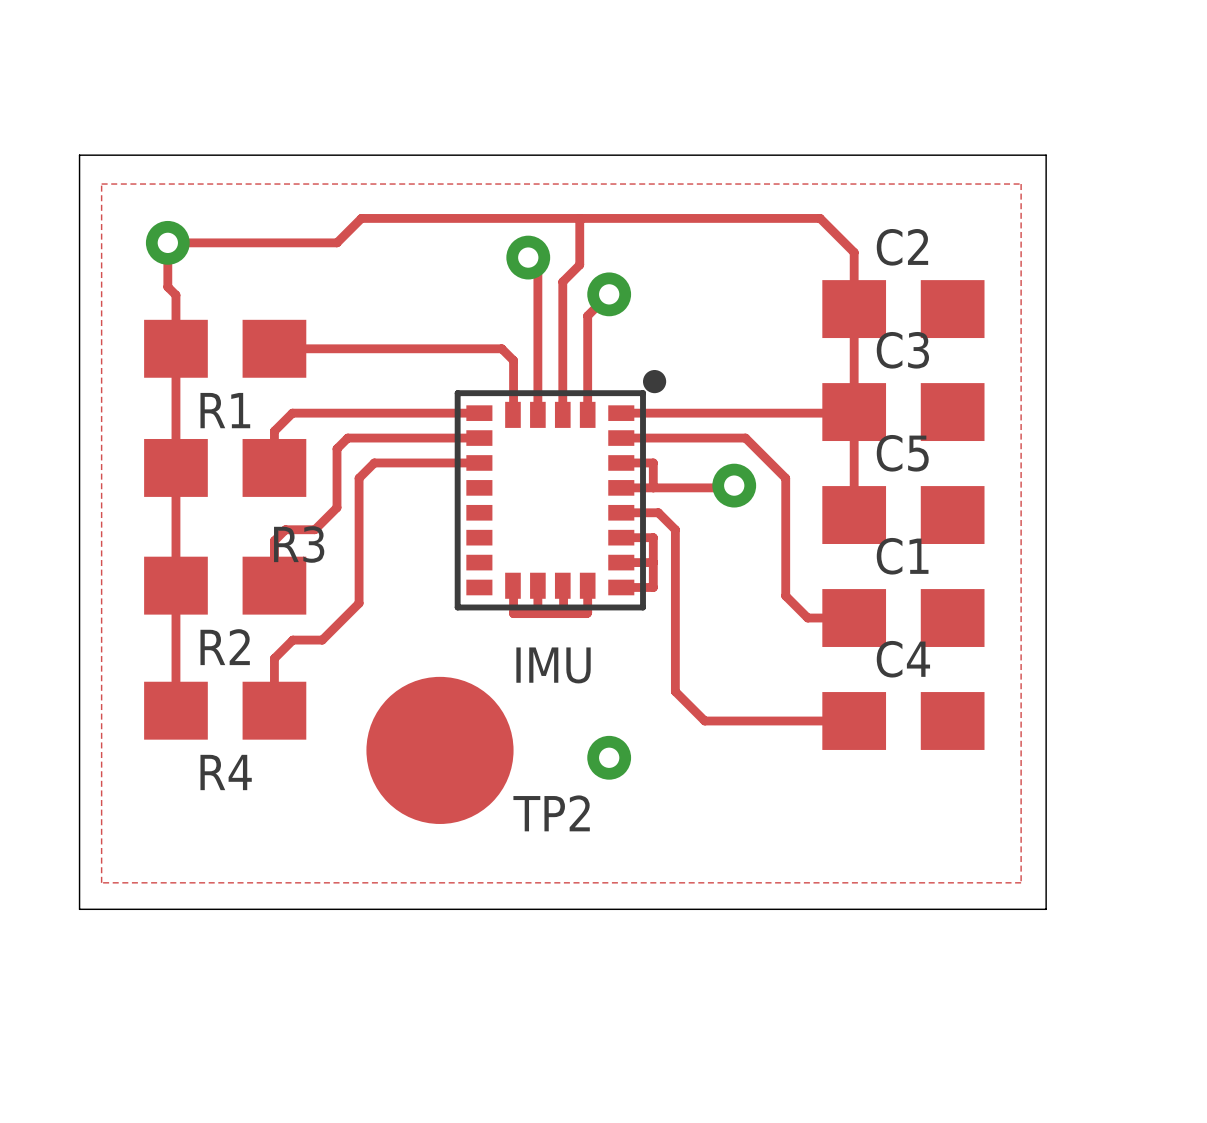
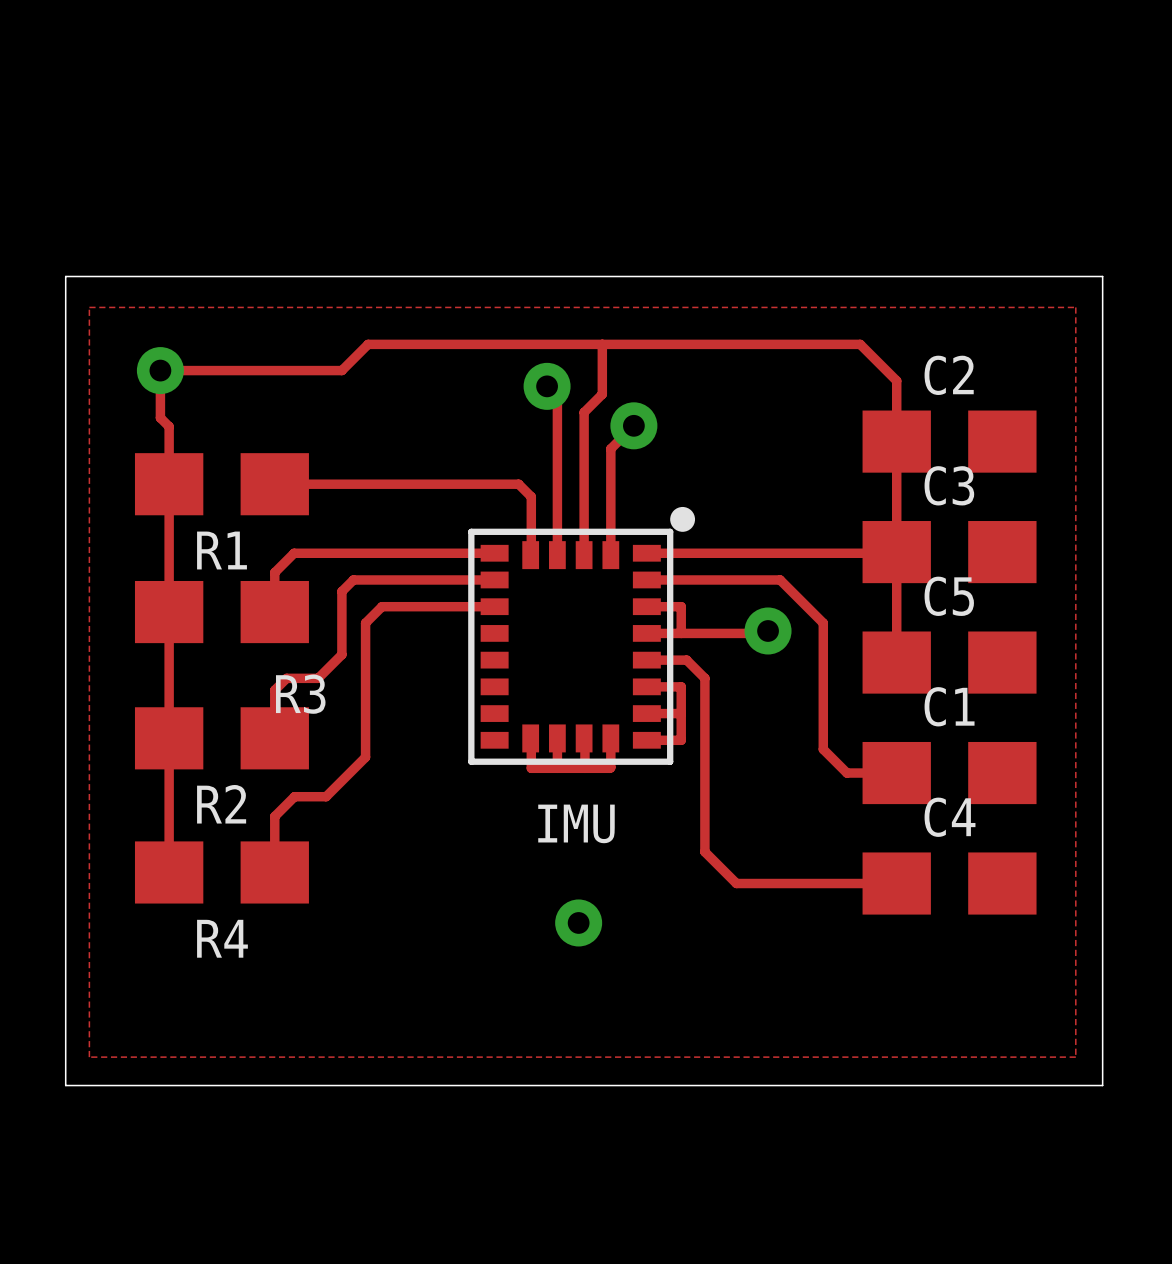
TP2: (439, 750) -> none
via position: (609, 757) -> (578, 922)

